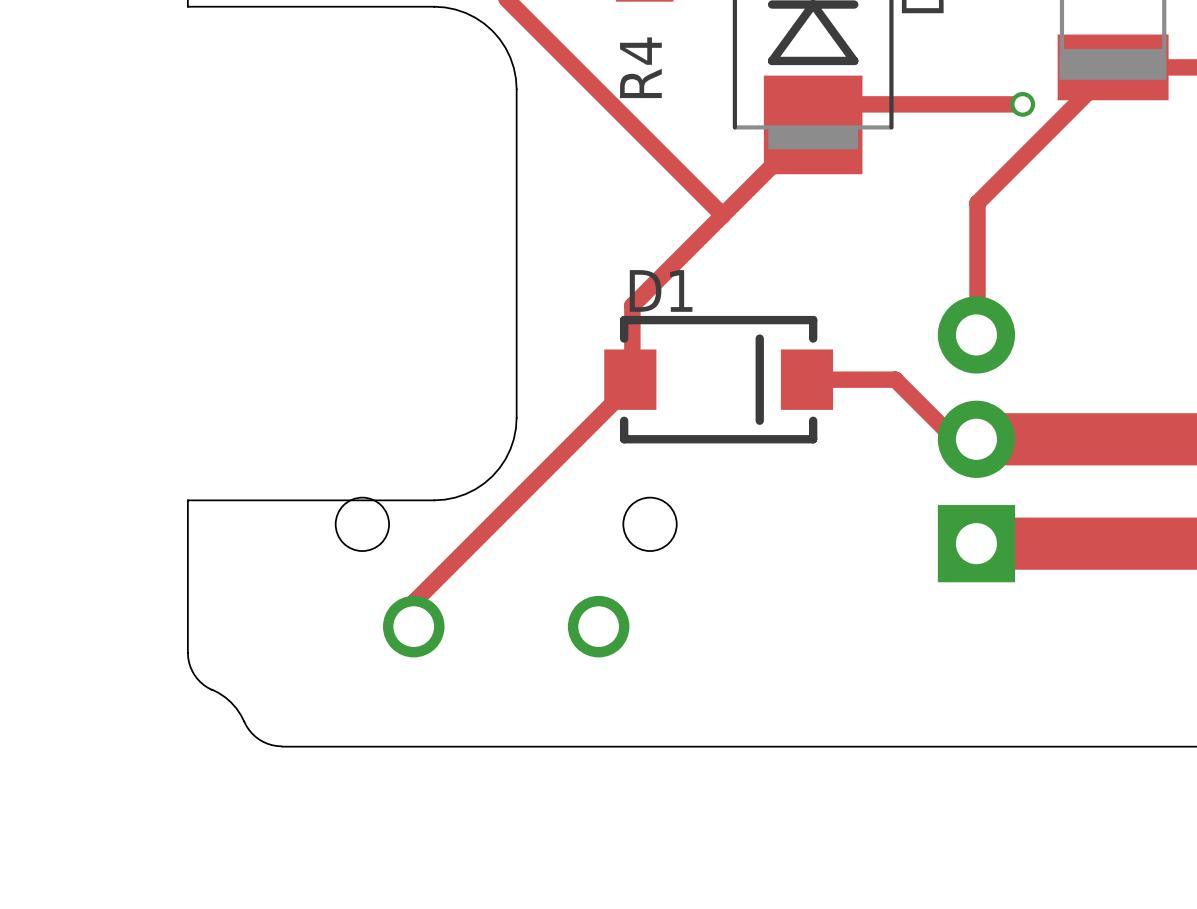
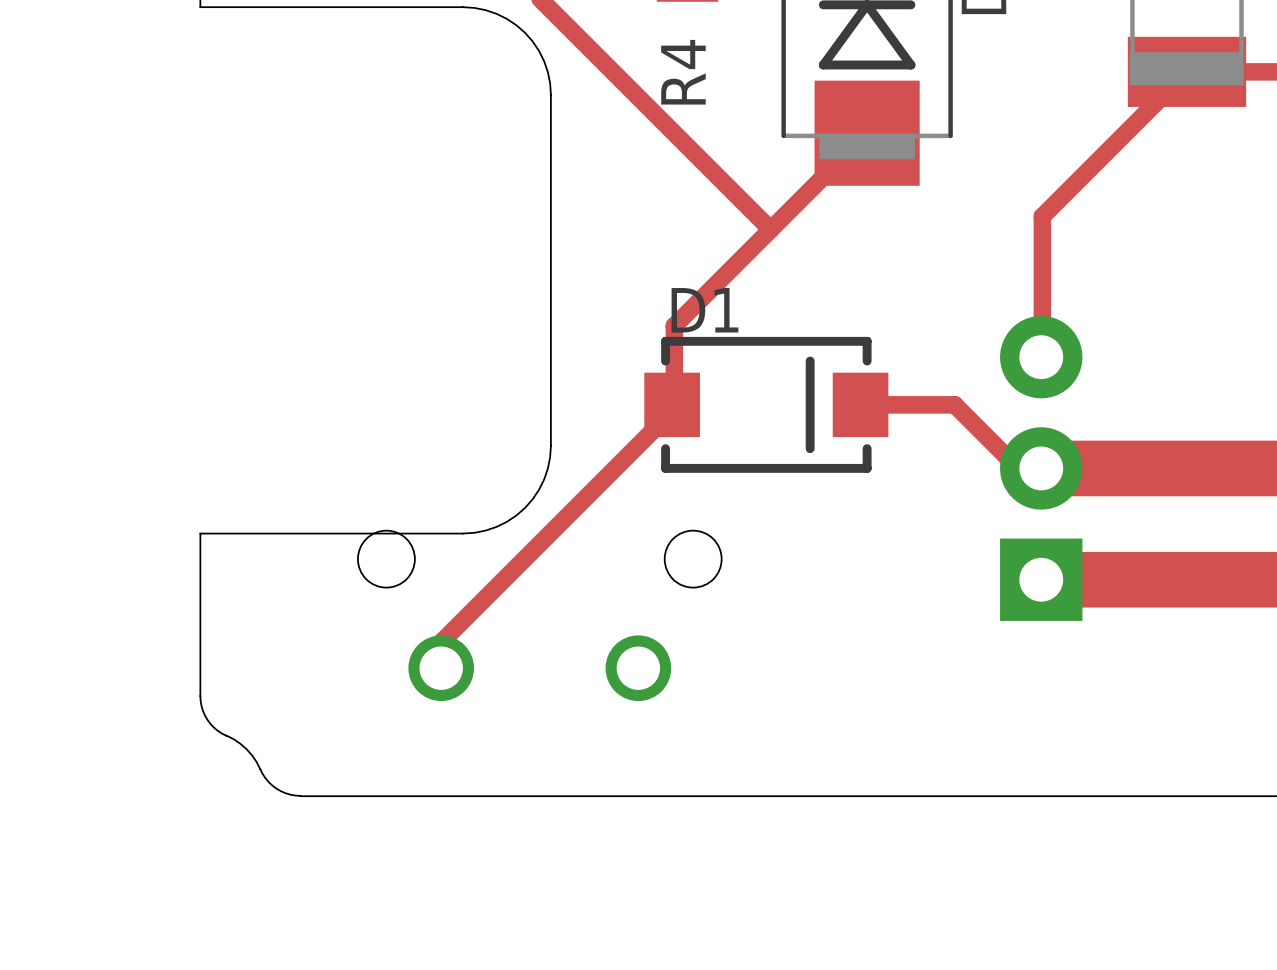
track: (1022, 104) (833, 104) (813, 124) -> none
via: (1022, 104) -> none

